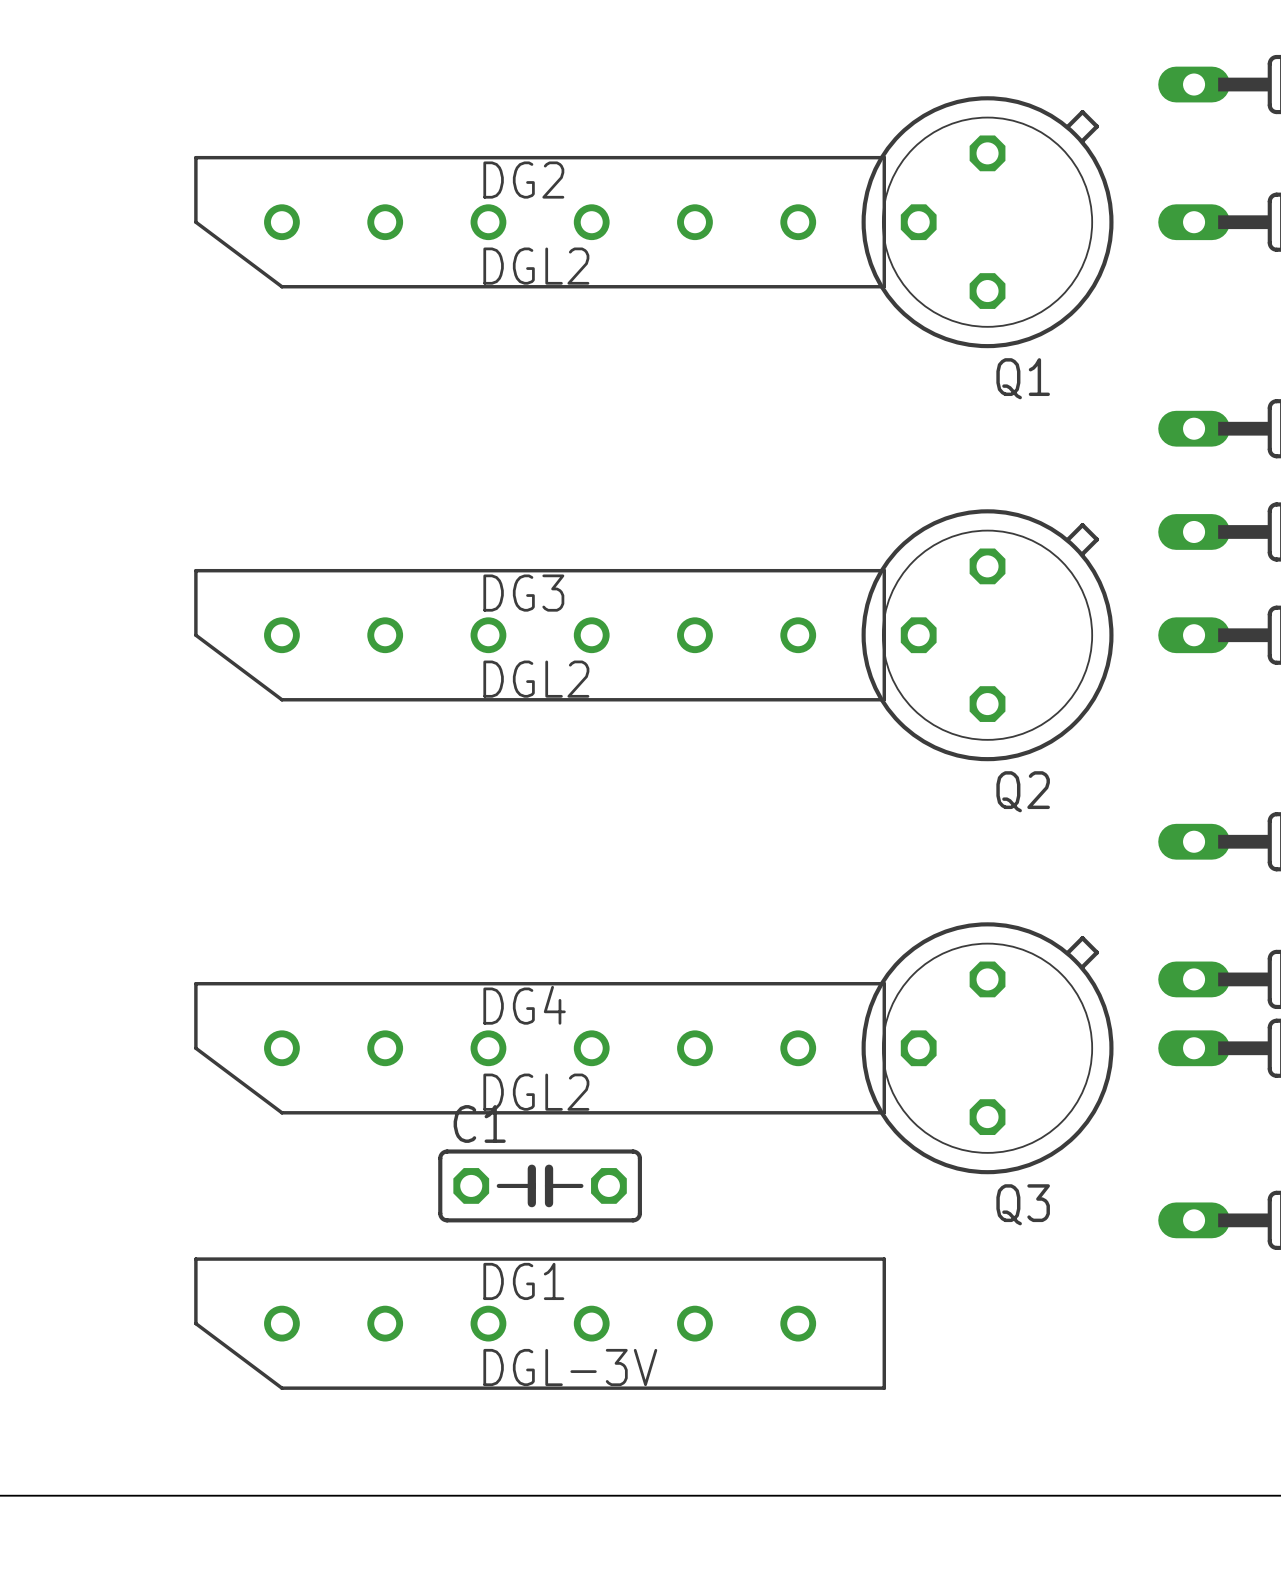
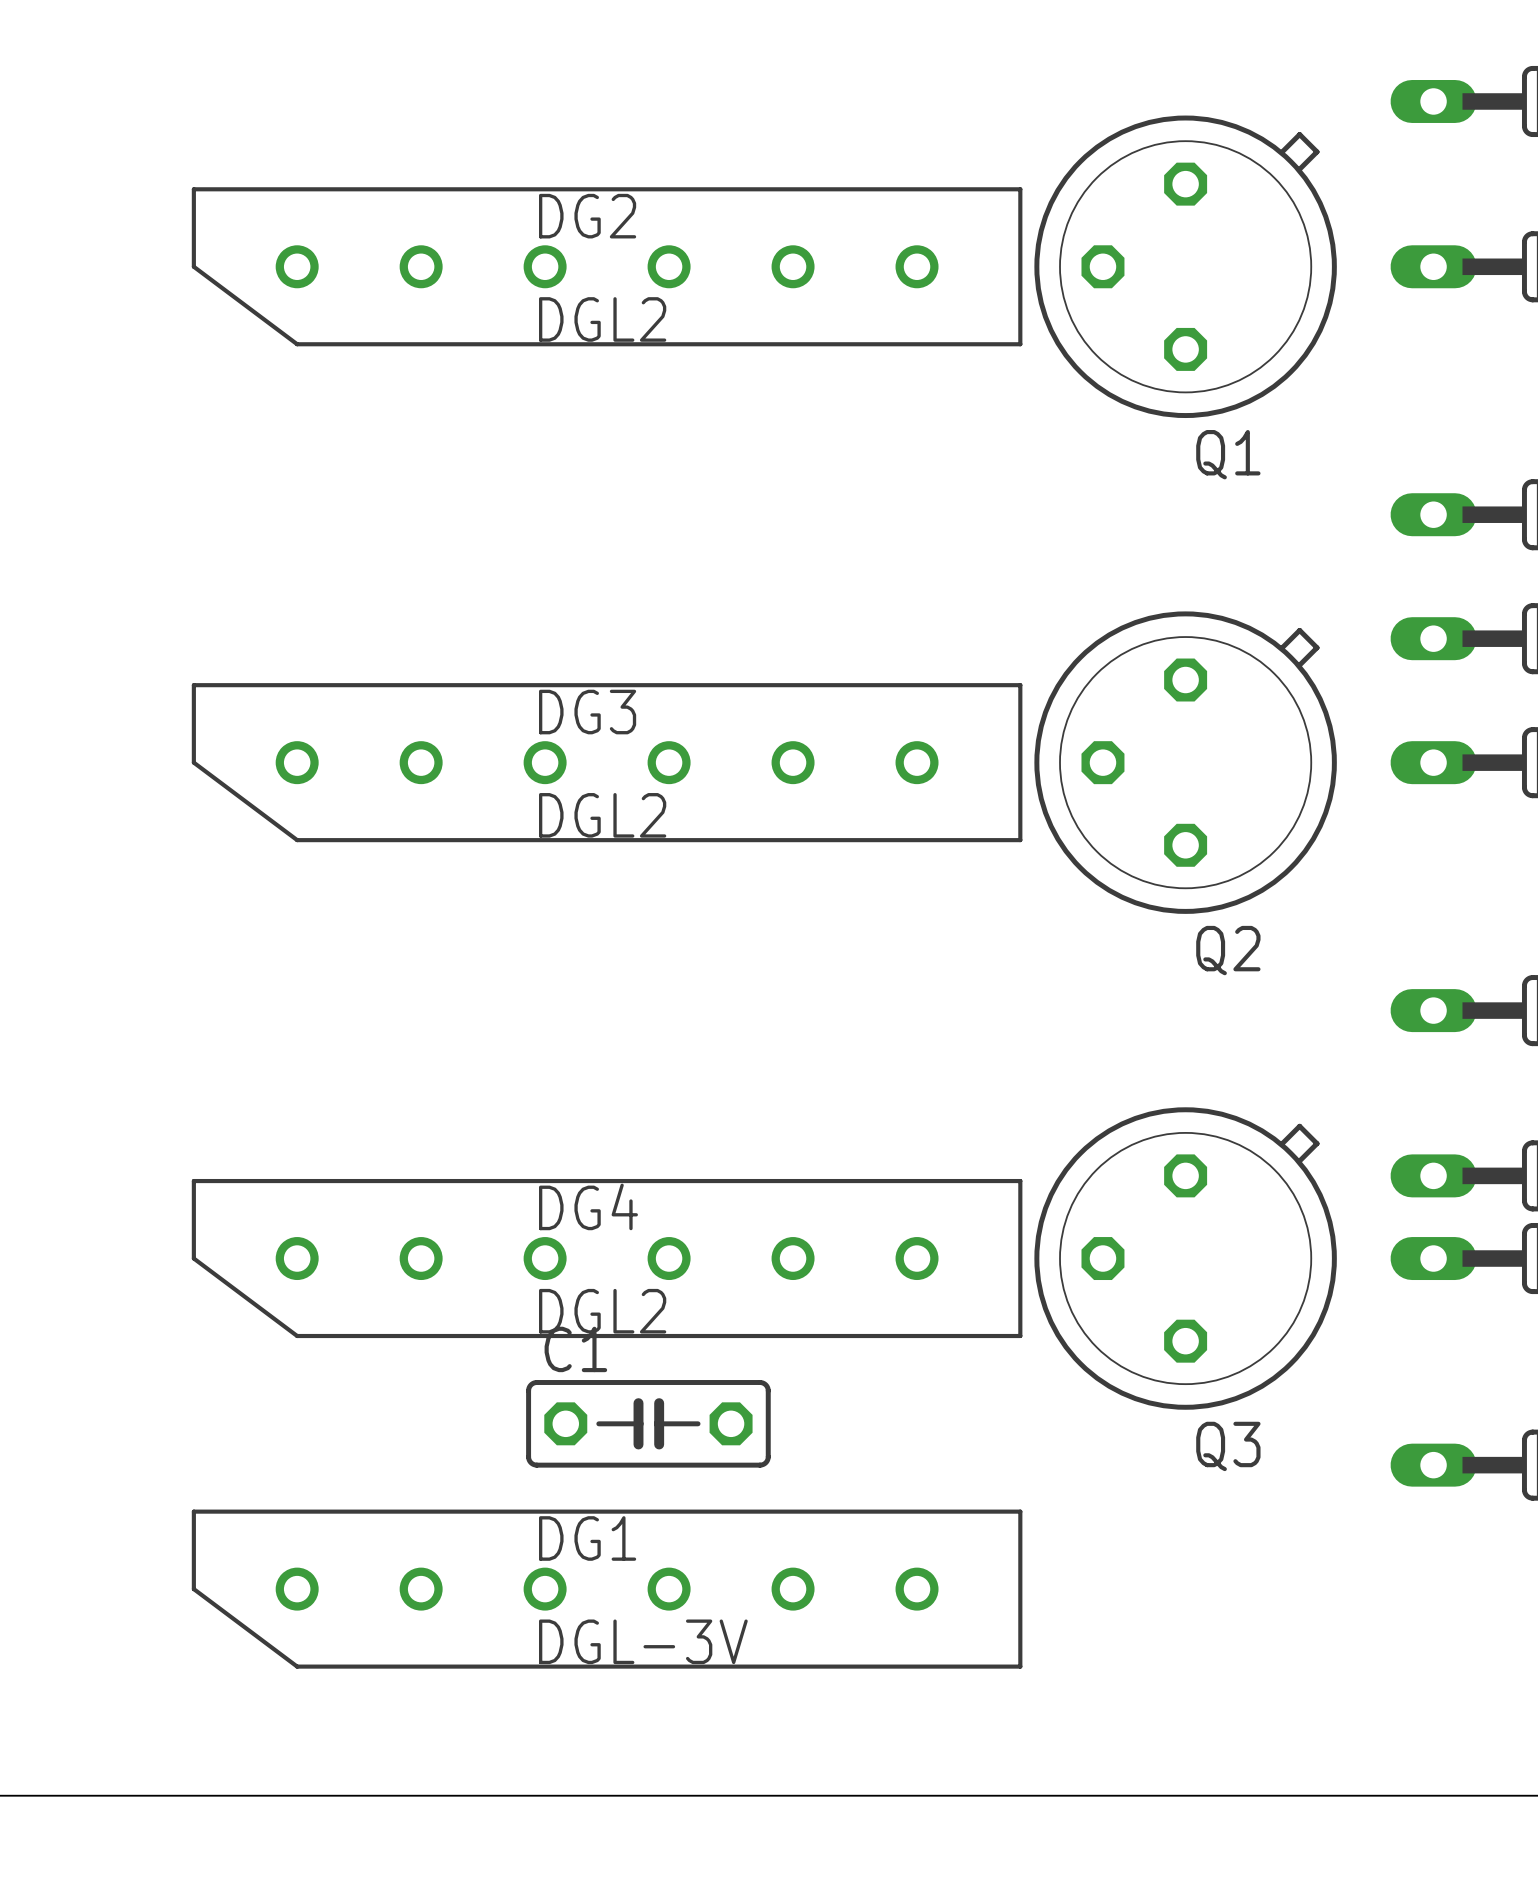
DG2 position: (540, 222) -> (607, 266)
DG3 position: (540, 635) -> (607, 762)
DG4 position: (540, 1048) -> (607, 1258)
DG1 position: (540, 1323) -> (607, 1589)

